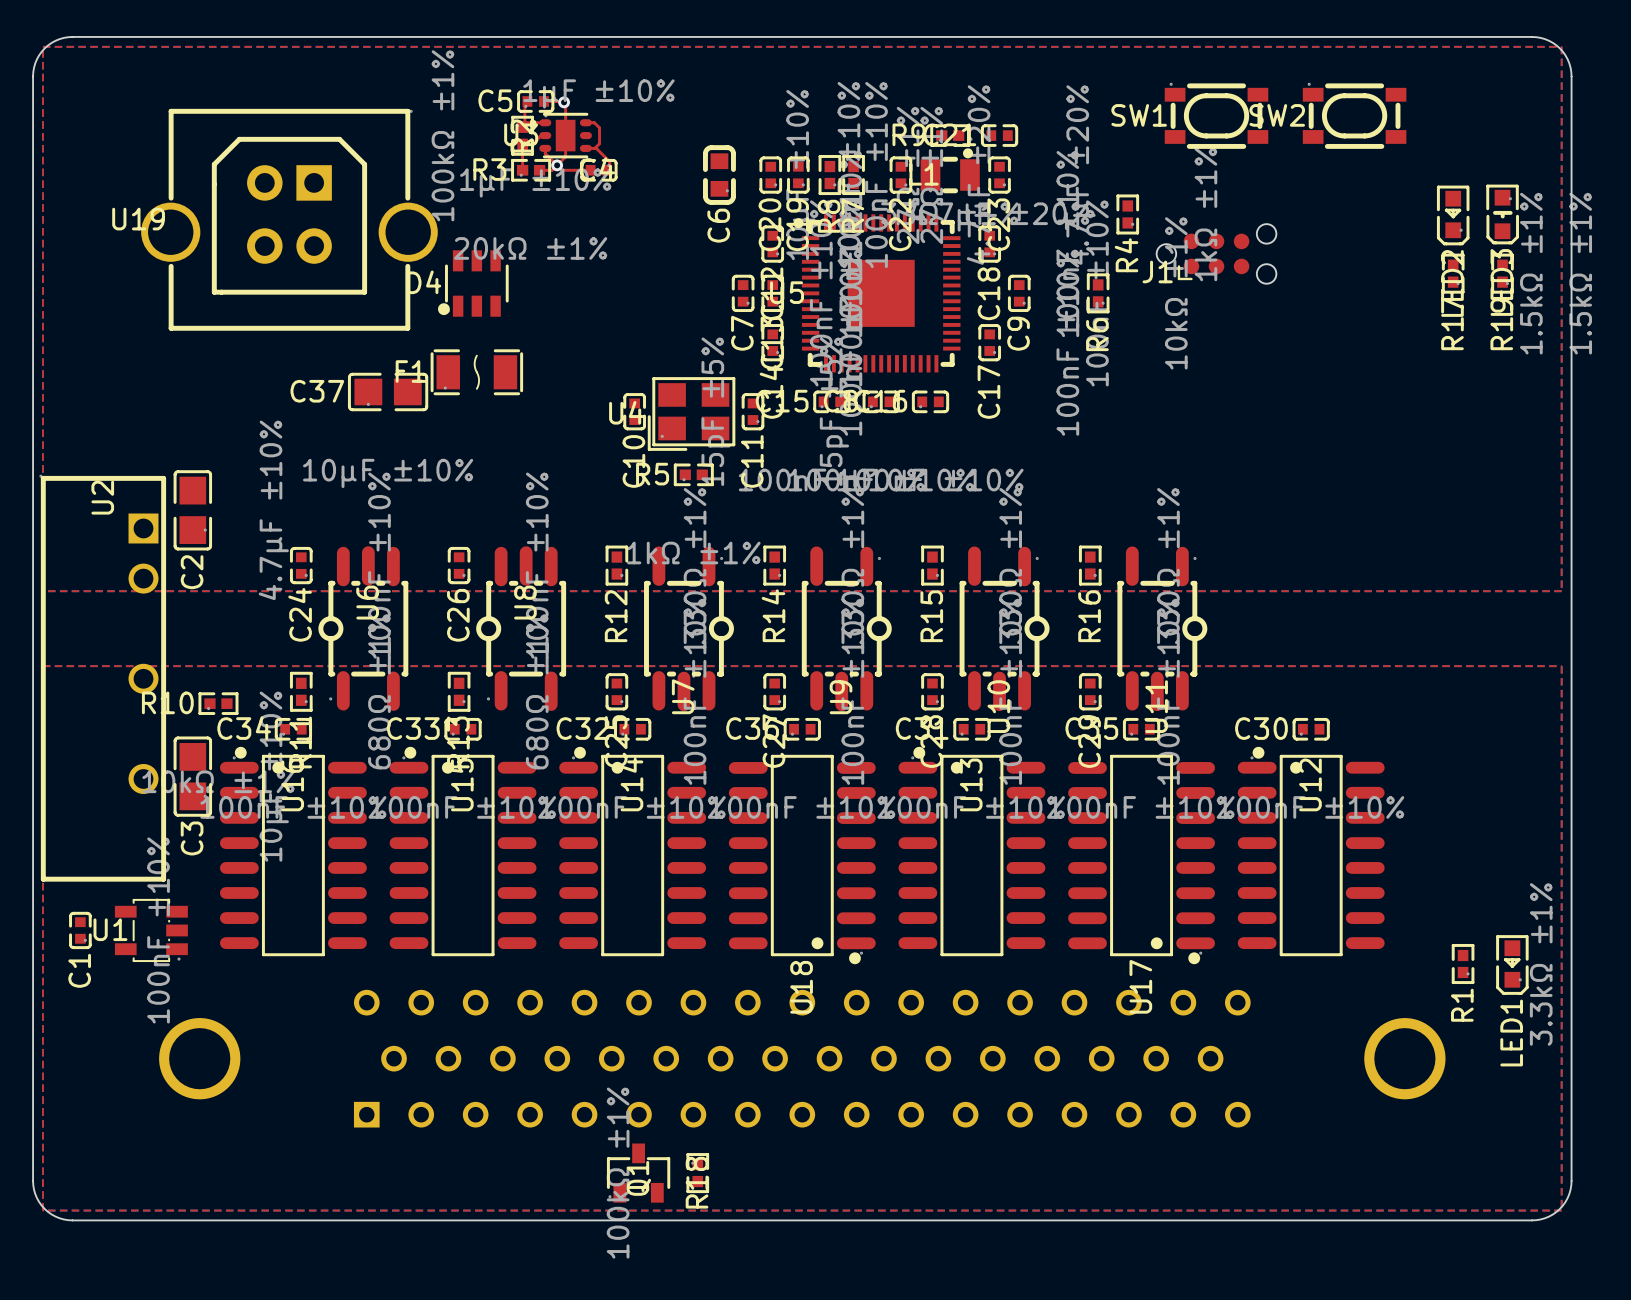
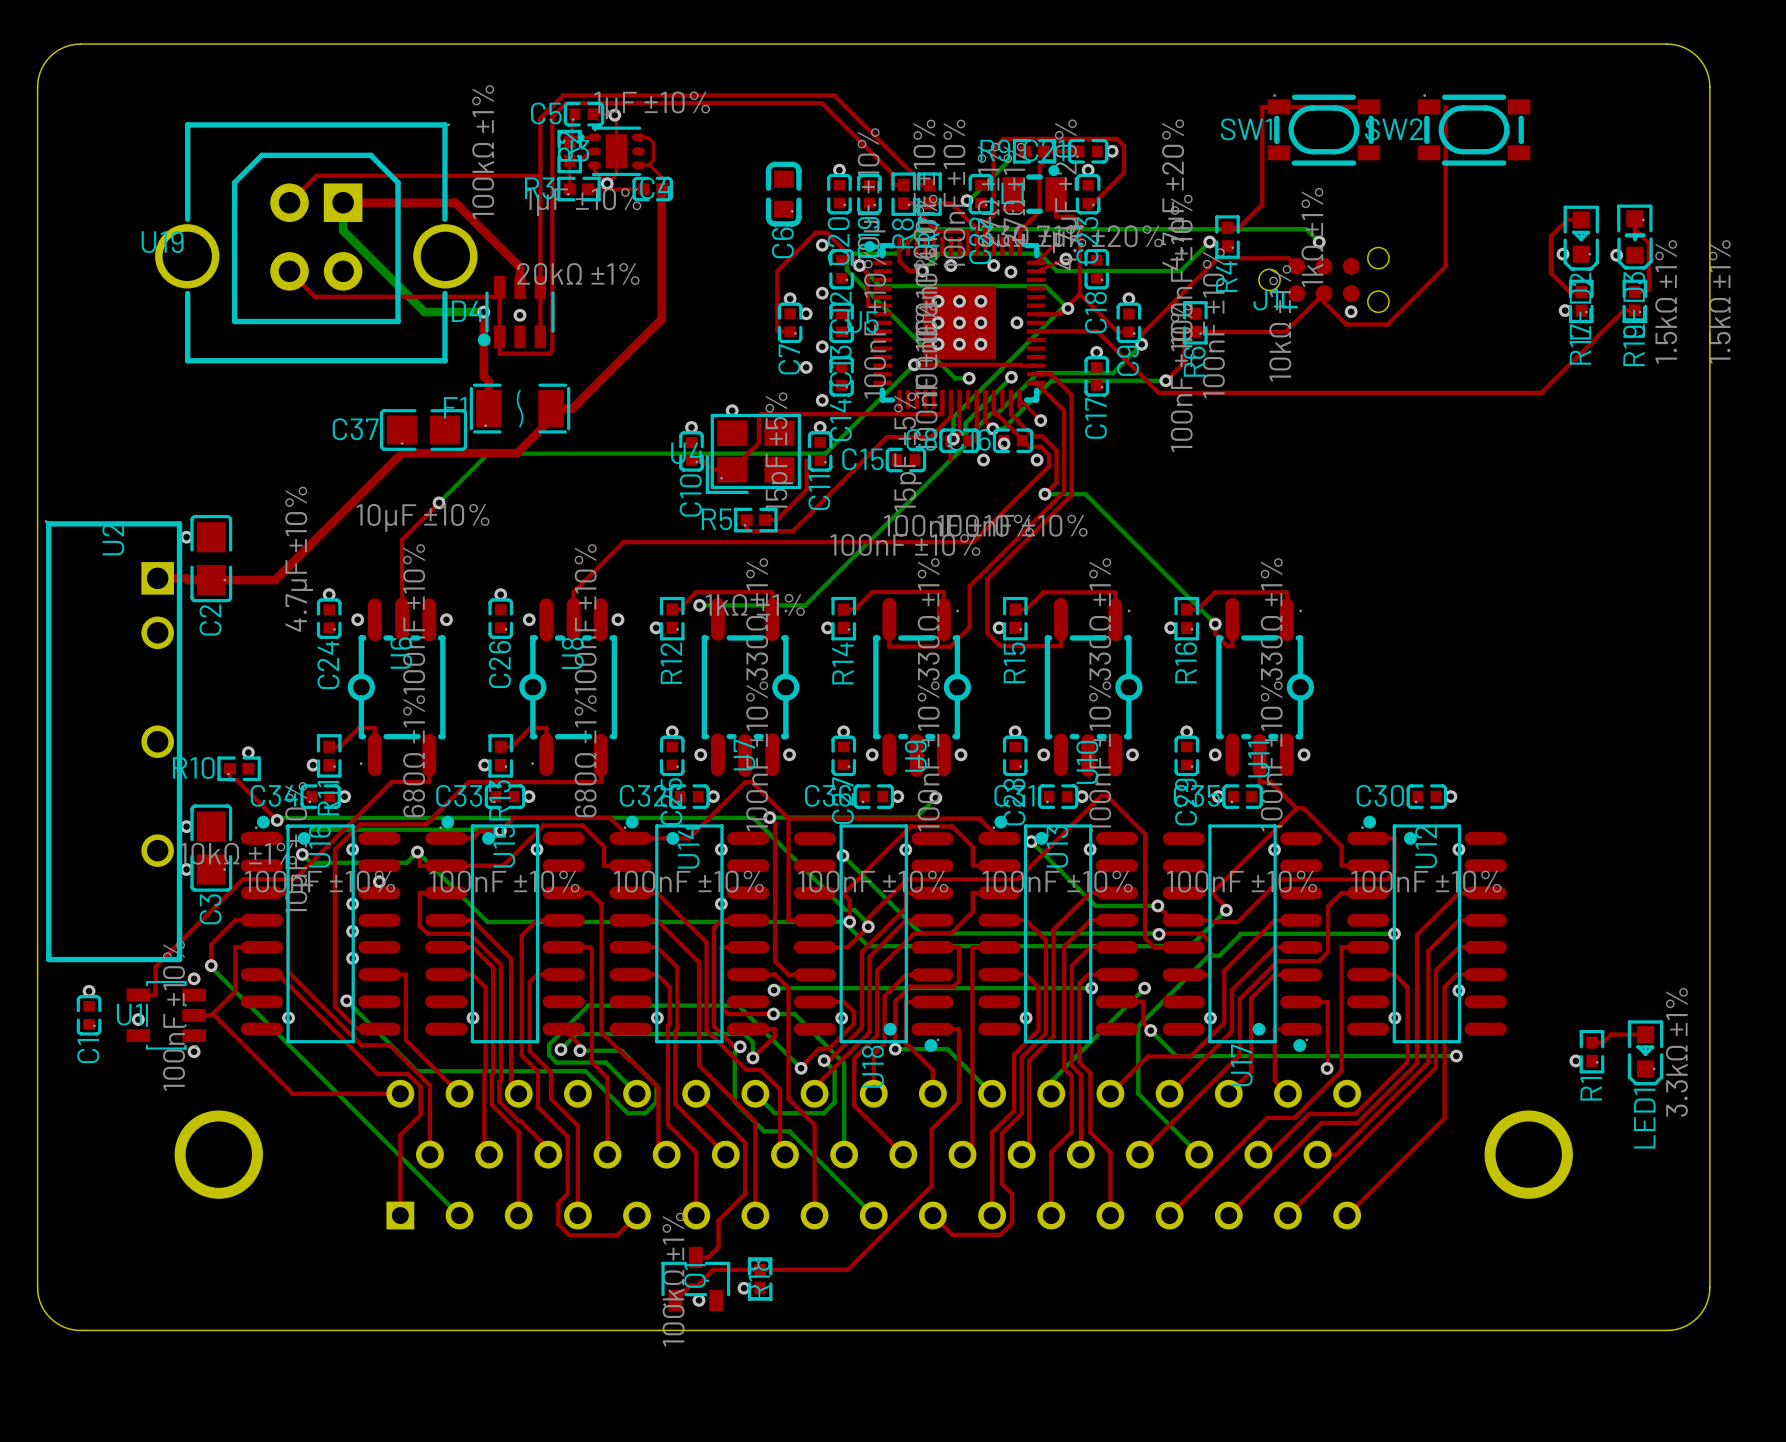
top zone outline: (42, 46) (1561, 46) (1561, 591) (42, 591) (42, 46) -> none
top track: none -> (1368, 106) (1262, 106) (1262, 204) (1238, 227) (1227, 227)
top track: none -> (1445, 106) (1445, 266) (1387, 324) (1346, 324) (1323, 302) (1323, 293) (1285, 332) (1184, 332) (1184, 362) (1165, 380)
top track: none -> (1079, 151) (1043, 151) (1043, 162) (1039, 166) (1039, 211) (1019, 231) (1019, 246)
via: none -> (1112, 151)
bottom track: none -> (1008, 157) (1008, 160) (967, 200)
via: none -> (839, 170)
via: none -> (1088, 170)
top track: none -> (540, 175) (316, 175) (289, 202)
top track: none -> (903, 184) (892, 184) (892, 173) (821, 103) (566, 103) (552, 117) (552, 351) (549, 353) (499, 353) (499, 287)
top track: none -> (929, 184) (918, 184) (918, 179) (834, 95) (563, 95) (540, 118) (540, 336)
top track: none -> (664, 189) (661, 189) (661, 319) (572, 408) (551, 408)
top track: none -> (1055, 194) (1055, 216) (1072, 216) (1079, 224) (1079, 293)
via: none -> (967, 200)
top track: none -> (343, 202) (455, 202) (519, 267) (519, 287)
bottom track: none -> (343, 202) (343, 230) (424, 312) (483, 312)
top track: none -> (903, 203) (914, 203) (914, 208) (937, 231) (968, 231) (968, 246)
top track: none -> (929, 203) (951, 203) (976, 228) (976, 246)
top track: none -> (1088, 208) (1124, 172) (1124, 146) (1116, 138) (1003, 138) (993, 148) (993, 215) (985, 223) (985, 246)
top track: none -> (1634, 218) (1634, 232) (1638, 232) (1648, 243) (1648, 289) (1646, 292) (1634, 292)
top track: none -> (1581, 219) (1567, 219) (1551, 236) (1551, 273) (1570, 292) (1581, 292)
bottom track: none -> (1209, 242) (1180, 270) (1056, 270) (1039, 253) (939, 253) (922, 271)
via: none -> (1209, 242)
bottom track: none -> (1319, 242) (1306, 229) (920, 229) (896, 253) (854, 253) (846, 261) (846, 269) (955, 378) (969, 378)
via: none -> (1319, 242)
via: none -> (822, 245)
top track: none -> (899, 246) (899, 261) (909, 271) (922, 271)
top track: none -> (1052, 246) (1036, 262)
via: none -> (1563, 254)
via: none -> (1616, 255)
top track: none -> (1065, 259) (1036, 271)
via: none -> (1065, 259)
bottom track: none -> (859, 265) (880, 286) (1045, 286) (1067, 308) (1062, 308) (953, 417) (953, 438)
via: none -> (859, 265)
via: none -> (950, 265)
via: none -> (993, 265)
top track: none -> (1296, 266) (1288, 258) (1217, 258) (1141, 334) (1141, 344)
C18 position: (989, 244) -> (1096, 269)
via: none -> (922, 271)
top track: none -> (289, 271) (314, 296) (499, 296)
via: none -> (1010, 271)
via: none -> (822, 293)
top track: none -> (1079, 293) (1059, 314) (1036, 314)
top track: none -> (1079, 293) (1117, 331) (1128, 331)
via: none -> (790, 298)
via: none -> (1128, 298)
via: none -> (938, 301)
via: none -> (959, 301)
via: none -> (980, 301)
top track: none -> (882, 305) (867, 305) (867, 273) (826, 232) (815, 232) (777, 271) (777, 330) (790, 331)
via: none -> (1067, 308)
via: none -> (1565, 310)
top track: none -> (1634, 310) (1623, 310) (1541, 392) (1158, 392) (1097, 331) (1036, 331)
top track: none -> (483, 312) (483, 376) (488, 381) (488, 408)
via: none -> (483, 312)
via: none -> (1351, 311)
via: none -> (806, 313)
via: none -> (519, 315)
C7 position: (743, 293) -> (790, 322)
via: none -> (938, 322)
via: none -> (959, 322)
via: none -> (980, 322)
via: none -> (1016, 322)
C9 position: (1019, 293) -> (1128, 322)
via: none -> (938, 344)
via: none -> (959, 344)
via: none -> (980, 344)
bottom track: none -> (1141, 344) (1113, 373) (1037, 373) (997, 413) (990, 413) (977, 427) (977, 441)
via: none -> (1141, 344)
via: none -> (822, 346)
via: none -> (1096, 352)
top track: none -> (914, 364) (1036, 365)
bottom track: none -> (914, 364) (825, 453) (488, 453) (439, 502)
via: none -> (914, 364)
via: none -> (806, 367)
top track: none -> (1036, 374) (1051, 374) (1071, 394) (1071, 495) (987, 579) (987, 632) (1000, 646) (1060, 646) (1060, 619)
C17 position: (989, 342) -> (1096, 376)
bottom track: none -> (1011, 377) (965, 423) (965, 445) (805, 605) (699, 605)
via: none -> (1011, 377)
via: none -> (969, 378)
bottom track: none -> (1165, 380) (1051, 380) (1003, 428) (992, 428)
via: none -> (1165, 380)
top track: none -> (1036, 382) (1064, 410) (1064, 491) (969, 586) (969, 627) (950, 646) (889, 646) (889, 619)
top track: none -> (942, 399) (942, 414) (761, 414) (758, 416) (758, 442) (732, 469) (711, 469) (702, 460) (691, 460)
top track: none -> (950, 399) (950, 416) (930, 437) (886, 437) (792, 531) (746, 531) (746, 520)
top track: none -> (959, 399) (959, 432) (950, 441) (950, 460)
top track: none -> (976, 399) (977, 441)
top track: none -> (985, 399) (985, 421) (992, 428)
top track: none -> (993, 399) (993, 414) (997, 414) (1029, 446) (1040, 446) (1048, 454) (1048, 466) (973, 542) (623, 542) (573, 592) (573, 619)
top track: none -> (1010, 399) (1010, 414) (1033, 436) (1042, 436) (1056, 450) (1056, 482) (1044, 494)
top track: none -> (1019, 399) (1040, 420)
via: none -> (822, 400)
top track: none -> (561, 408) (517, 453) (402, 453) (275, 580) (157, 578)
via: none -> (732, 410)
via: none -> (1040, 420)
via: none -> (691, 427)
via: none -> (820, 427)
via: none -> (992, 428)
via: none -> (953, 438)
C15 position: (831, 401) -> (905, 460)
via: none -> (1004, 443)
via: none -> (983, 460)
via: none -> (1037, 460)
top track: none -> (806, 460) (806, 489) (776, 520) (765, 520)
bottom track: none -> (1044, 494) (1085, 494) (1215, 624)
via: none -> (1044, 494)
top track: none -> (439, 502) (402, 539) (402, 619)
via: none -> (439, 502)
via: none -> (186, 537)
via: none -> (329, 594)
via: none -> (500, 594)
via: none -> (699, 605)
top track: none -> (672, 609) (683, 609) (683, 604) (696, 592) (771, 592) (772, 619)
top track: none -> (843, 609) (854, 609) (872, 591) (942, 591) (943, 619)
top track: none -> (1015, 609) (1026, 609) (1043, 592) (1114, 592) (1115, 619)
top track: none -> (1186, 609) (1197, 609) (1214, 592) (1286, 592) (1286, 619)
via: none -> (357, 619)
via: none -> (446, 619)
via: none -> (529, 619)
via: none -> (617, 619)
top track: none -> (1232, 619) (1232, 646) (1227, 646) (1215, 634) (1215, 624)
via: none -> (1215, 624)
via: none -> (656, 627)
via: none -> (827, 627)
via: none -> (999, 627)
via: none -> (1170, 627)
top zone outline: (42, 666) (42, 1210) (1561, 1210) (1561, 666) (42, 666) -> none
via: none -> (672, 731)
via: none -> (843, 731)
via: none -> (1015, 731)
via: none -> (1186, 731)
top track: none -> (329, 746) (340, 746) (359, 727) (374, 727) (374, 754)
top track: none -> (500, 746) (511, 746) (530, 727) (546, 727) (546, 754)
via: none -> (248, 752)
via: none -> (700, 754)
via: none -> (789, 754)
via: none -> (872, 754)
via: none -> (961, 754)
via: none -> (1043, 754)
via: none -> (1132, 754)
via: none -> (1215, 754)
via: none -> (1304, 754)
top track: none -> (429, 755) (429, 782) (391, 782) (294, 879) (242, 879) (155, 966) (155, 994) (138, 994)
top track: none -> (600, 755) (600, 782) (468, 782) (426, 824) (360, 824) (334, 849) (334, 1006) (357, 1029) (379, 1029)
top track: none -> (1259, 755) (1259, 782) (1270, 782) (1296, 808)
via: none -> (313, 765)
via: none -> (484, 765)
top track: none -> (229, 768) (229, 779) (236, 779) (277, 820)
via: none -> (344, 796)
via: none -> (528, 796)
via: none -> (713, 796)
via: none -> (897, 796)
via: none -> (1082, 796)
via: none -> (1218, 796)
via: none -> (1450, 796)
bottom track: none -> (935, 797) (916, 817) (769, 817)
via: none -> (935, 797)
top track: none -> (1296, 808) (1303, 808) (1341, 846) (1341, 865) (1368, 865)
top track: none -> (1296, 808) (1212, 893) (1226, 907) (1226, 910)
top track: none -> (769, 817) (775, 822) (775, 961) (788, 974) (815, 974)
via: none -> (769, 817)
top track: none -> (788, 818) (788, 920) (815, 920)
top track: none -> (788, 818) (979, 818) (999, 838)
top track: none -> (788, 818) (752, 782) (745, 782) (688, 838) (630, 838) (610, 817) (513, 817) (500, 830) (480, 830) (472, 838) (446, 838)
bottom track: none -> (277, 820) (279, 817) (753, 817) (845, 910) (854, 910) (868, 923) (868, 926)
via: none -> (277, 820)
via: none -> (186, 826)
bottom track: none -> (312, 829) (500, 830)
via: none -> (500, 830)
top track: none -> (1368, 838) (1394, 838) (1394, 871) (1386, 879) (1280, 879) (1237, 922) (1183, 920)
bottom track: none -> (1031, 841) (1095, 905) (1157, 905)
via: none -> (1031, 841)
via: none -> (352, 849)
via: none -> (536, 849)
via: none -> (721, 849)
via: none -> (1090, 849)
via: none -> (1458, 849)
via: none -> (905, 849)
via: none -> (1274, 849)
top track: none -> (417, 852) (419, 854) (419, 865) (503, 865) (543, 825) (582, 825) (604, 846) (604, 865) (630, 865)
via: none -> (417, 852)
bottom track: none -> (302, 854) (310, 862) (406, 862) (417, 852) (487, 921) (849, 921) (849, 927) (868, 946) (1190, 946) (1226, 910)
via: none -> (302, 854)
bottom track: none -> (843, 855) (920, 933) (1158, 934)
via: none -> (843, 855)
top track: none -> (999, 865) (972, 865) (972, 846) (952, 826) (910, 826) (843, 893) (849, 900) (849, 921)
via: none -> (186, 869)
via: none -> (379, 881)
top track: none -> (261, 892) (288, 892) (288, 971) (361, 1045) (389, 1045) (429, 1085) (429, 1154)
top track: none -> (446, 892) (419, 892) (419, 925) (427, 933) (469, 933) (500, 964) (499, 1101) (548, 1148) (548, 1154)
top track: none -> (563, 892) (590, 892) (601, 904) (601, 1032) (658, 1087) (658, 1146) (666, 1154)
top track: none -> (630, 892) (657, 892) (706, 942) (706, 1030) (746, 1069) (760, 1069) (780, 1089) (780, 1149) (784, 1154)
top track: none -> (999, 892) (972, 892) (972, 911) (950, 933) (913, 933) (877, 970) (877, 1035) (854, 1058) (854, 1105) (903, 1154)
top track: none -> (1116, 892) (1090, 892) (1053, 929) (1053, 1036) (1029, 1060) (1029, 1147) (1021, 1154)
top track: none -> (1368, 892) (1341, 892) (1328, 906) (1328, 952) (1319, 961) (1277, 961) (1239, 999) (1239, 1054) (1140, 1154)
top track: none -> (1485, 892) (1459, 892) (1416, 935) (1416, 1063) (1357, 1122) (1321, 1122) (1228, 1215)
top track: none -> (932, 893) (905, 893) (905, 907) (861, 951) (861, 1027) (829, 1060) (824, 1060)
via: none -> (352, 903)
via: none -> (721, 903)
top track: none -> (1157, 905) (1166, 914)
via: none -> (1157, 905)
via: none -> (1226, 910)
top track: none -> (261, 920) (235, 920) (211, 944) (211, 965)
top track: none -> (446, 920) (472, 920) (511, 958) (511, 1086) (518, 1093)
top track: none -> (563, 920) (537, 920) (521, 935) (521, 1055) (538, 1071) (538, 1107) (567, 1136) (567, 1193) (558, 1203) (558, 1224) (569, 1235) (617, 1235) (637, 1215)
top track: none -> (630, 920) (657, 920) (698, 962) (698, 1065) (755, 1121) (755, 1215)
top track: none -> (748, 920) (721, 920) (714, 927) (714, 1026) (734, 1046) (740, 1046)
top track: none -> (932, 920) (905, 920) (869, 956) (869, 1032) (814, 1087) (814, 1093)
top track: none -> (999, 920) (1025, 920) (1046, 940) (1046, 1033) (1021, 1057) (1021, 1113) (1002, 1133) (1002, 1184) (1012, 1194) (1012, 1223) (1000, 1234) (952, 1234) (932, 1215)
top track: none -> (1116, 920) (1090, 920) (1064, 946) (1064, 1068) (1071, 1076) (1071, 1131) (1051, 1152) (1051, 1215)
top track: none -> (1301, 920) (1274, 920) (1224, 970) (1224, 1022) (1190, 1056) (1147, 1056) (1110, 1093)
top track: none -> (1485, 920) (1459, 920) (1428, 951) (1428, 1062) (1336, 1154) (1317, 1154)
via: none -> (849, 921)
via: none -> (868, 926)
via: none -> (352, 931)
bottom track: none -> (1394, 933) (1240, 933) (1219, 955) (1213, 955) (1211, 953) (1138, 1026) (1138, 1093) (1199, 1154)
via: none -> (1394, 933)
top track: none -> (1158, 934) (1201, 933) (1210, 942) (1210, 974) (1183, 974)
via: none -> (1158, 934)
top track: none -> (261, 947) (235, 947) (235, 991) (211, 1015) (194, 1015)
top track: none -> (446, 947) (472, 947) (493, 967) (491, 1104) (518, 1131) (518, 1215)
top track: none -> (563, 947) (591, 948) (591, 1062) (607, 1078) (607, 1154)
top track: none -> (630, 947) (657, 947) (677, 967) (675, 1104) (725, 1154)
top track: none -> (748, 947) (721, 947) (721, 1007) (727, 1014) (773, 1014)
top track: none -> (815, 947) (847, 947) (868, 926) (868, 918) (906, 879) (1017, 879) (1101, 795) (1106, 795) (1145, 834) (1145, 938) (1154, 947) (1183, 947)
top track: none -> (932, 947) (959, 947) (959, 981) (953, 986) (910, 986) (895, 1001) (895, 1049)
top track: none -> (999, 947) (972, 947) (972, 1144) (962, 1154)
top track: none -> (1116, 947) (1090, 947) (1071, 965) (1071, 1065) (1080, 1074) (1080, 1154)
top track: none -> (1301, 947) (1274, 947) (1231, 990) (1231, 1031) (1169, 1093)
top track: none -> (1368, 947) (1341, 947) (1341, 1070) (1294, 1117) (1267, 1117) (1169, 1215)
top track: none -> (1485, 947) (1459, 947) (1435, 970) (1435, 1067) (1287, 1215)
via: none -> (352, 958)
bottom track: none -> (211, 965) (459, 1215)
via: none -> (211, 965)
top track: none -> (261, 974) (278, 974) (377, 1074) (408, 1074) (420, 1086) (420, 1114) (400, 1135) (400, 1215)
top track: none -> (379, 974) (405, 974) (405, 1040) (459, 1093)
top track: none -> (446, 974) (472, 974) (485, 987) (484, 1149) (489, 1154)
top track: none -> (563, 974) (537, 974) (529, 982) (529, 1050) (551, 1072) (551, 1098) (577, 1125) (577, 1215)
top track: none -> (630, 974) (657, 974) (669, 987) (667, 1124) (696, 1152) (696, 1215)
top track: none -> (748, 974) (775, 974) (788, 987) (788, 1098) (814, 1125) (814, 1215)
top track: none -> (999, 974) (1025, 974) (1038, 987) (1038, 1030) (1014, 1054) (1014, 1110) (992, 1132) (992, 1215)
top track: none -> (1116, 974) (1088, 974) (1079, 983) (1079, 1062) (1090, 1073) (1090, 1132) (1110, 1152) (1110, 1215)
top track: none -> (1368, 974) (1394, 974) (1407, 987) (1407, 1061) (1355, 1114) (1308, 1114) (1268, 1154) (1258, 1154)
top track: none -> (1485, 974) (1456, 974) (1444, 986) (1444, 1118) (1347, 1215)
top track: none -> (932, 974) (905, 974) (884, 996) (884, 1043) (873, 1053) (873, 1093)
top track: none -> (1301, 974) (1274, 974) (1251, 998) (1251, 1071) (1228, 1093)
via: none -> (194, 978)
bottom track: none -> (1091, 988) (776, 988) (774, 990)
via: none -> (1091, 988)
bottom track: none -> (1144, 988) (1051, 1081) (1051, 1093)
via: none -> (1144, 988)
via: none -> (774, 990)
via: none -> (1458, 990)
via: none -> (89, 991)
bottom track: none -> (346, 1000) (417, 1071) (585, 1071) (627, 1113) (645, 1113) (656, 1102) (656, 1085) (621, 1050) (579, 1050)
via: none -> (346, 1000)
top track: none -> (815, 1001) (843, 1001) (854, 1012) (854, 1023) (829, 1048) (819, 1048) (801, 1068)
top track: none -> (932, 1001) (905, 1001) (905, 1043) (932, 1070) (932, 1093)
top track: none -> (1116, 1001) (1143, 1001) (1143, 1023) (1150, 1030)
top track: none -> (1301, 1001) (1327, 1001) (1327, 1068)
top track: none -> (212, 1013) (292, 1093) (400, 1093)
bottom track: none -> (773, 1014) (794, 1014) (844, 1063) (844, 1154)
via: none -> (773, 1014)
via: none -> (288, 1017)
via: none -> (472, 1017)
via: none -> (657, 1017)
via: none -> (1026, 1017)
via: none -> (1394, 1017)
via: none -> (841, 1018)
via: none -> (1210, 1018)
via: none -> (138, 1019)
top track: none -> (563, 1029) (579, 1045) (579, 1050)
top track: none -> (748, 1029) (774, 1029) (774, 1036) (752, 1057)
top track: none -> (932, 1029) (959, 1029) (959, 1102) (931, 1129) (931, 1185) (847, 1269) (712, 1269) (697, 1285) (690, 1285) (675, 1300)
top track: none -> (1301, 1029) (1274, 1029) (1274, 1080) (1287, 1093)
bottom track: none -> (1150, 1030) (1176, 1056) (1456, 1056)
via: none -> (1150, 1030)
top track: none -> (1645, 1034) (1611, 1034) (1603, 1042) (1591, 1042)
bottom track: none -> (740, 1046) (734, 1052) (734, 1101) (764, 1131) (789, 1131) (873, 1215)
via: none -> (740, 1046)
bottom track: none -> (895, 1049) (947, 1049) (992, 1093)
via: none -> (895, 1049)
bottom track: none -> (560, 1049) (576, 1034) (744, 1034) (752, 1042) (752, 1057)
via: none -> (560, 1049)
via: none -> (579, 1050)
via: none -> (194, 1051)
via: none -> (1456, 1056)
via: none -> (752, 1057)
bottom track: none -> (824, 1060) (834, 1070) (834, 1102) (823, 1113) (774, 1113) (755, 1093)
via: none -> (824, 1060)
via: none -> (1575, 1060)
bottom track: none -> (801, 1068) (738, 1005) (588, 1005) (549, 1044) (549, 1055) (556, 1062) (605, 1062) (637, 1093)
via: none -> (801, 1068)
via: none -> (1327, 1068)
top track: none -> (696, 1093) (745, 1142) (745, 1193) (718, 1220) (718, 1247) (708, 1257) (695, 1257)
via: none -> (744, 1288)
via: none -> (699, 1300)

